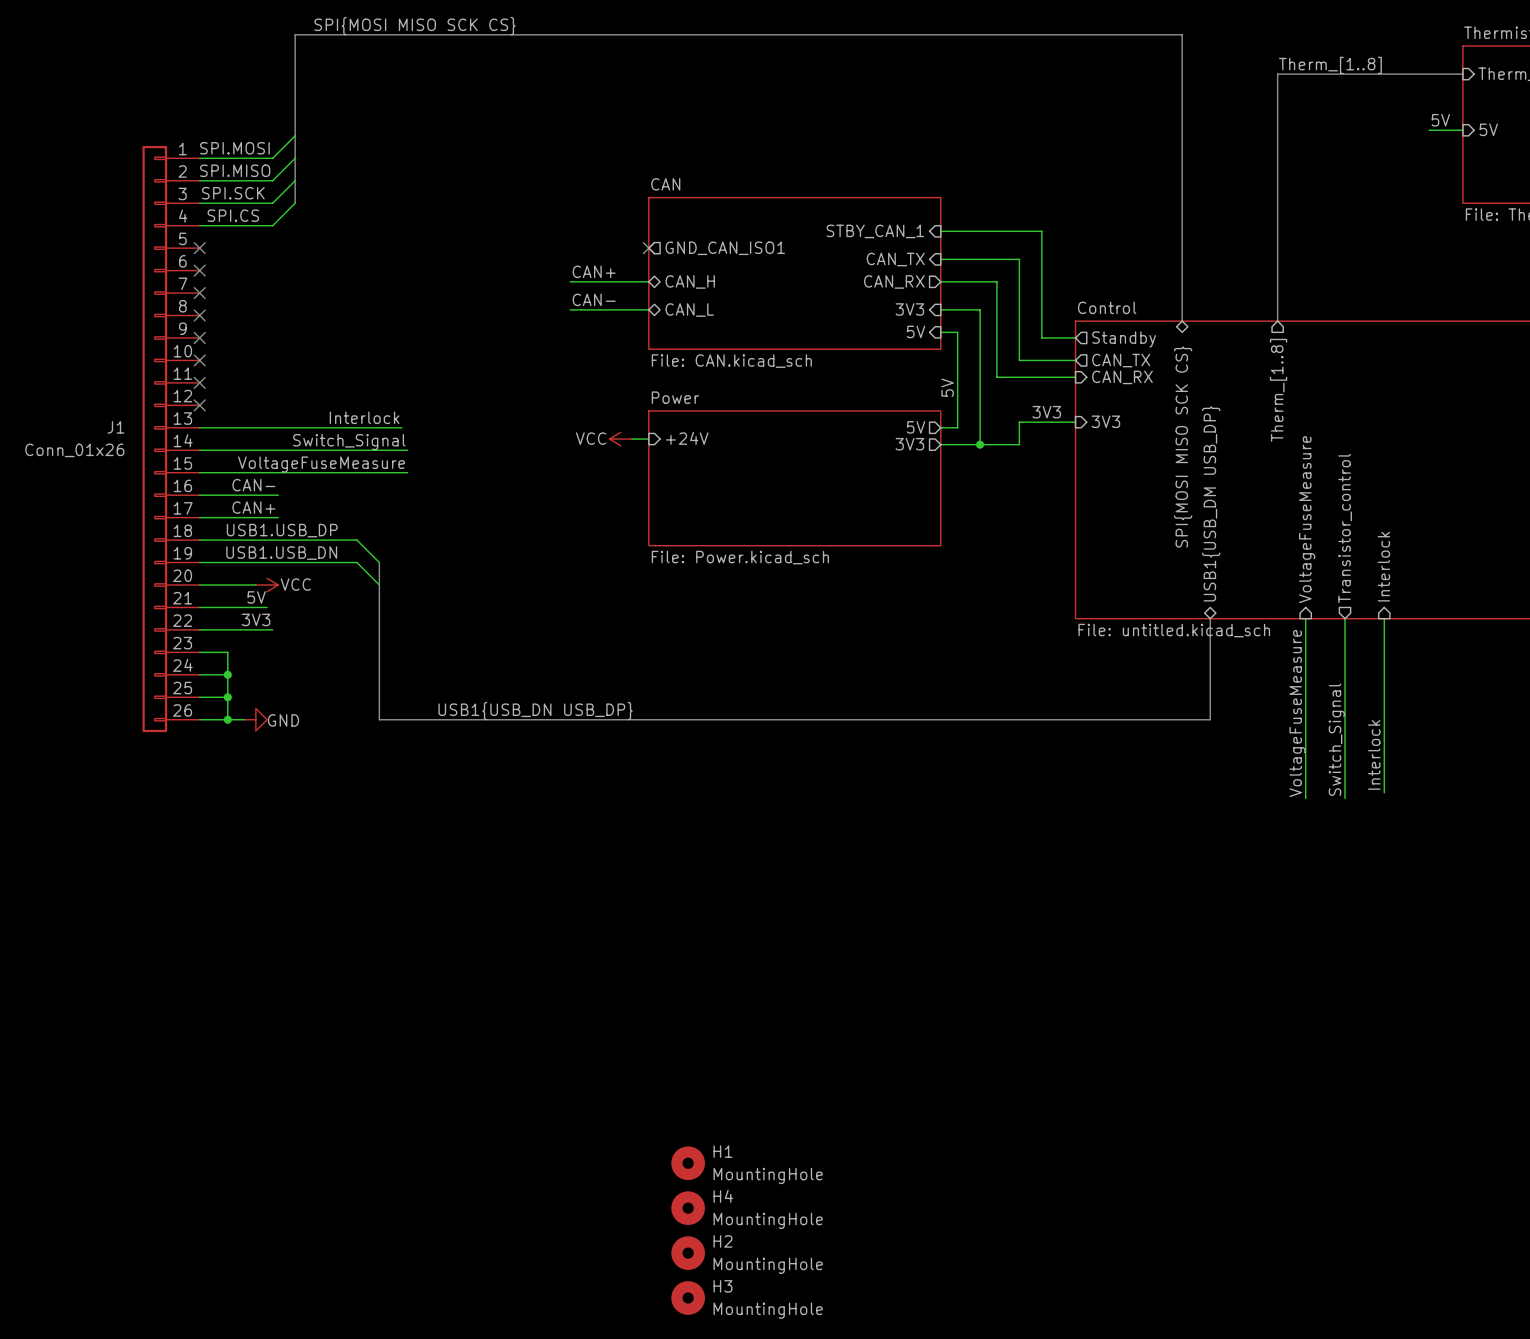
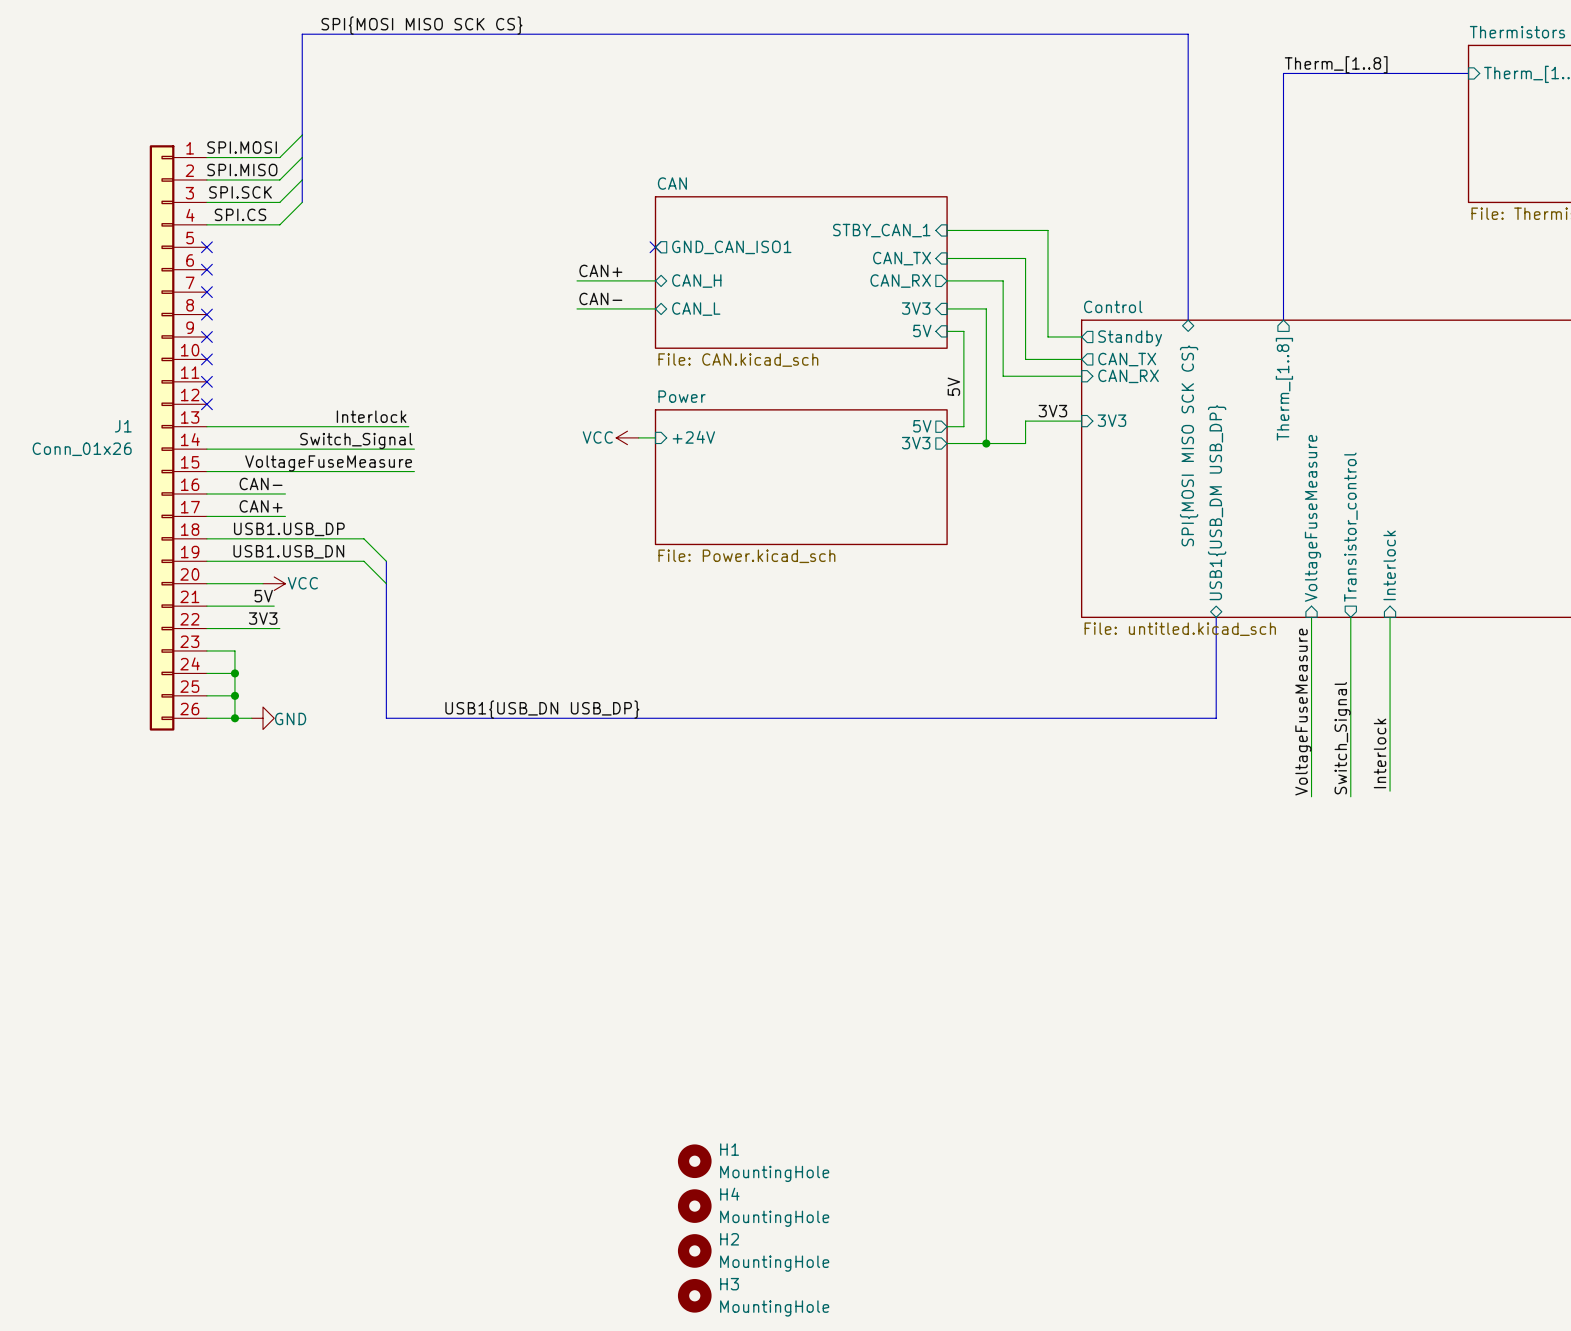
label: 5V (1440, 120) -> none
sheet pin: 5V (1488, 129) -> none
wire: (1429, 130) (1462, 130) -> none

